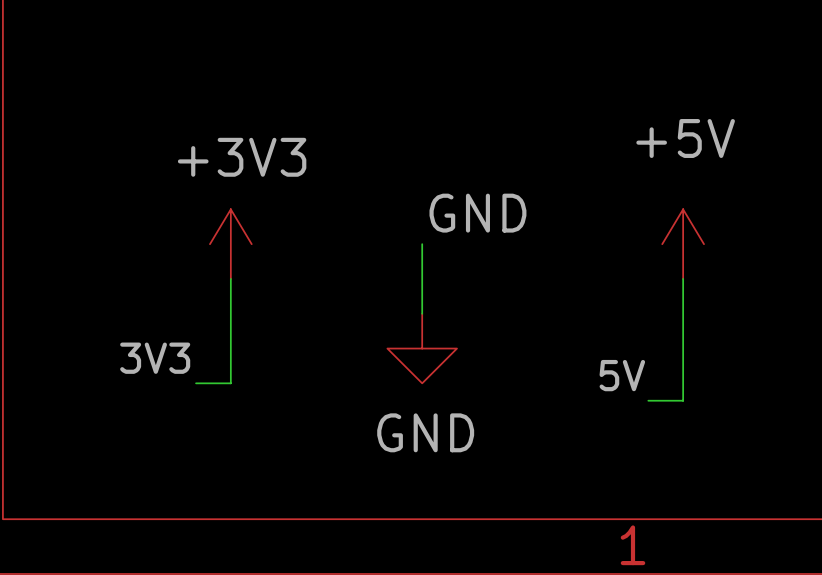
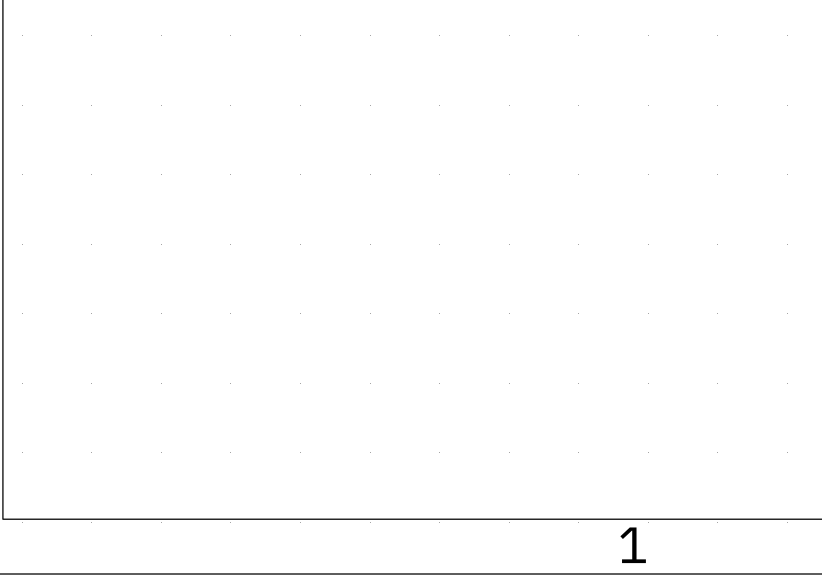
label: GND (477, 213) -> none
power symbol: +3V3 (230, 244) -> none
wire: (422, 244) (422, 313) -> none
power symbol: +5V (683, 244) -> none
wire: (230, 278) (230, 383) (196, 383) -> none
wire: (683, 278) (683, 400) (648, 400) -> none
power symbol: GND (422, 348) -> none
label: 3V3 (155, 358) -> none
label: 5V (622, 375) -> none

